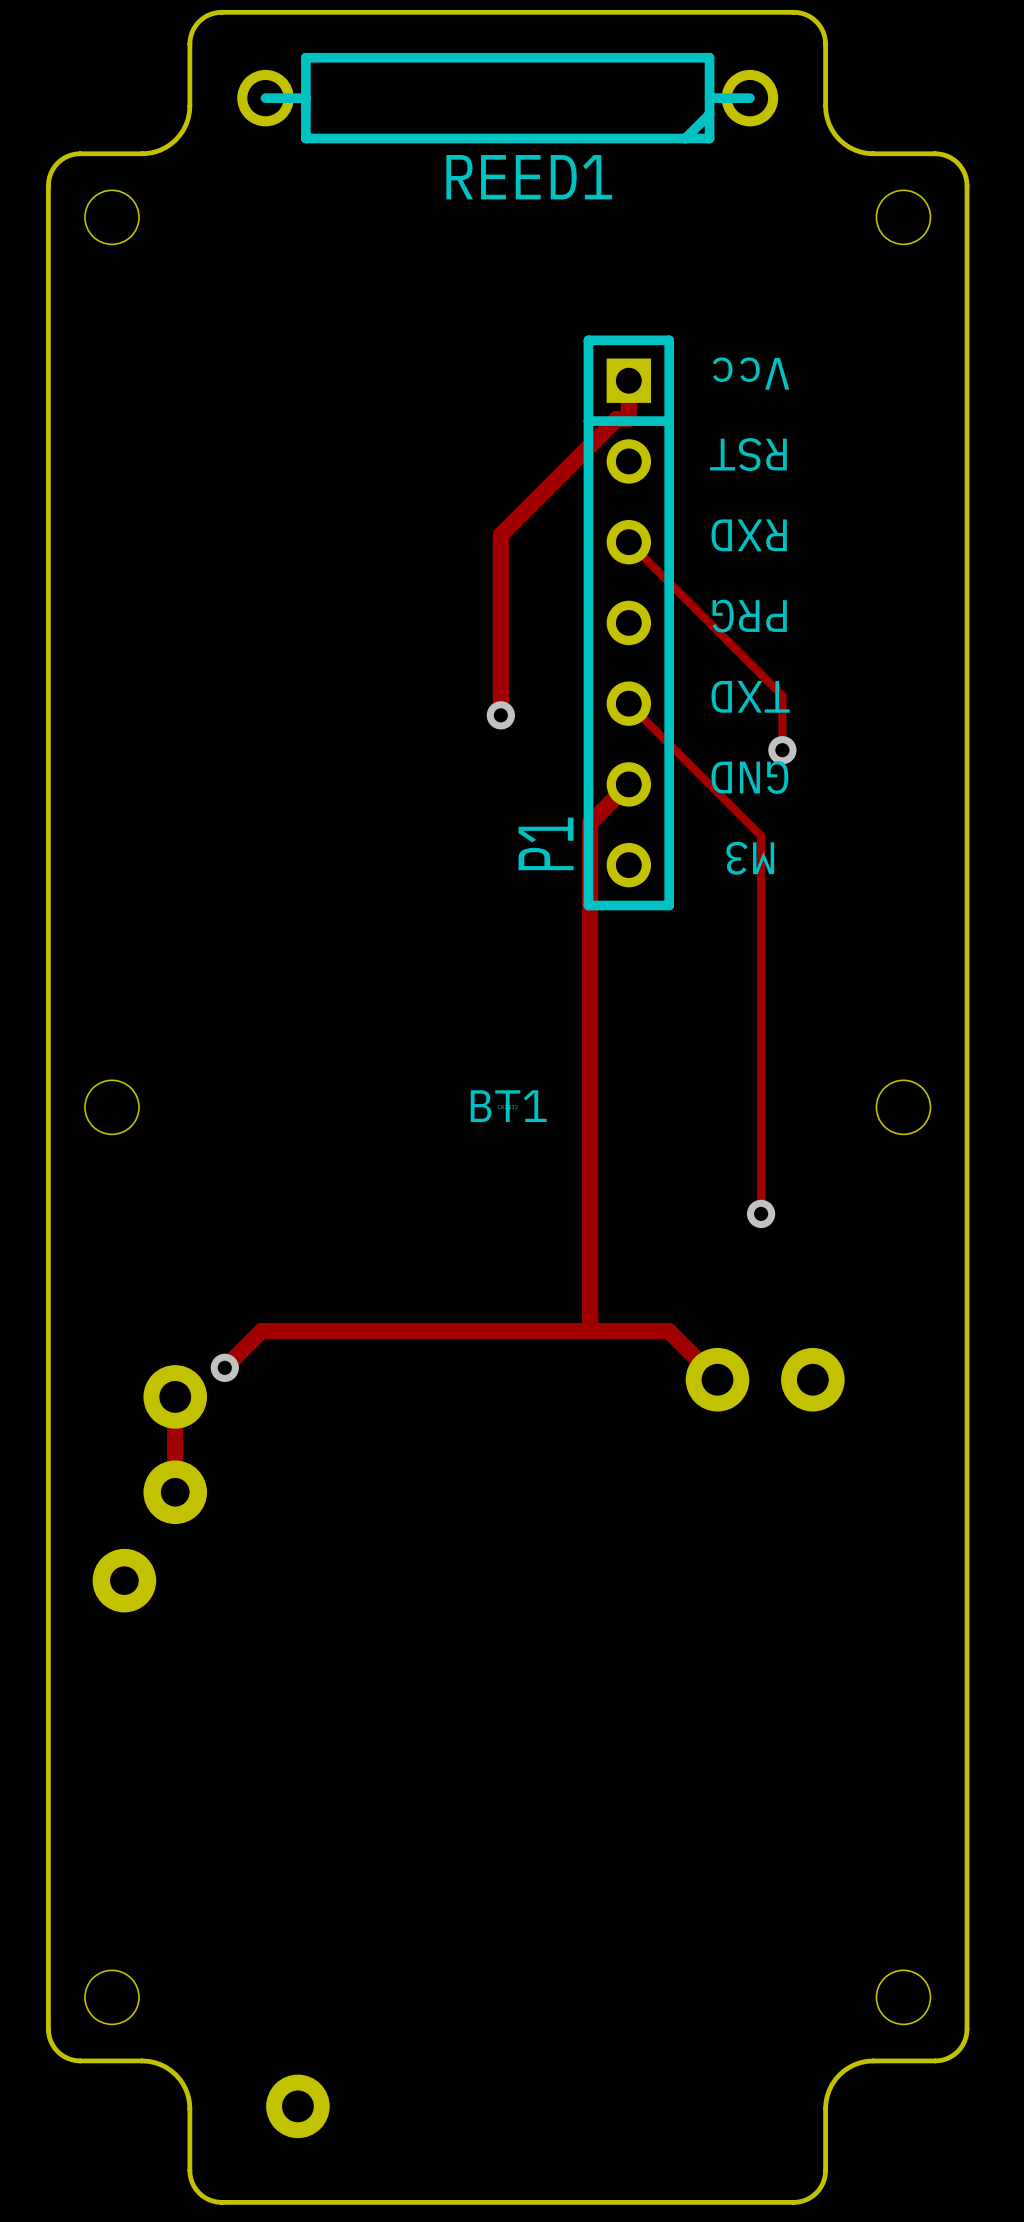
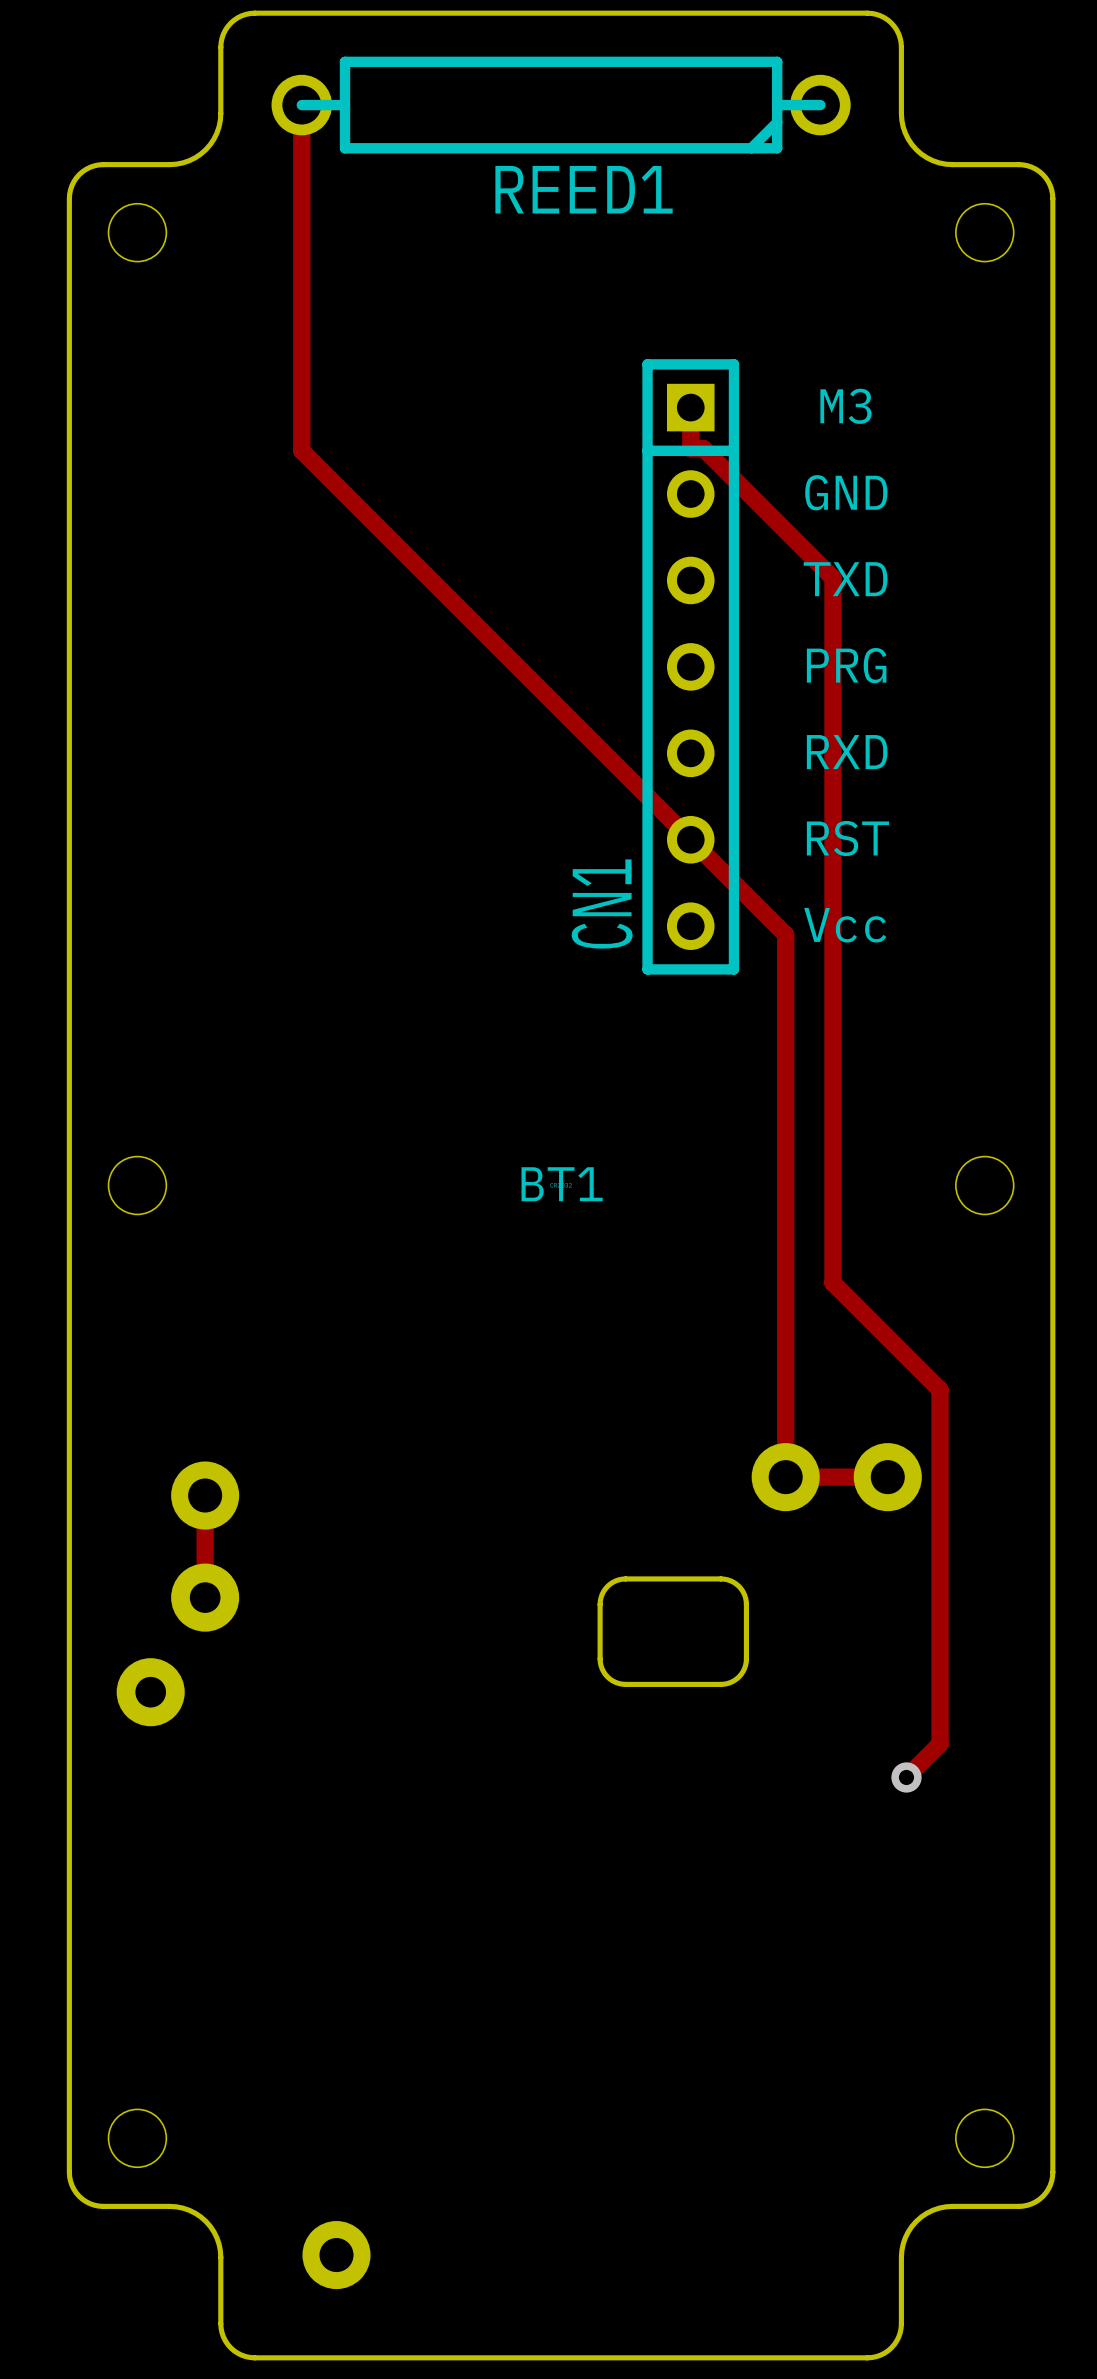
track: none -> (301, 105) (301, 450) (785, 934) (785, 1477) (887, 1477)
text rotation: 0° (751, 373) -> 180° (845, 925)
text position: Vcc (751, 373) -> Vcc (845, 925)
track: (628, 419) (616, 419) (500, 535) (500, 715) -> (690, 448) (703, 448) (832, 578) (832, 1282) (940, 1389) (940, 1743) (906, 1777)
text rotation: 0° (748, 454) -> 180° (847, 838)
text position: RST (748, 454) -> RST (847, 838)
text rotation: 0° (749, 535) -> 180° (847, 752)
text position: RXD (749, 535) -> RXD (847, 752)
track: (628, 542) (782, 695) (782, 750) -> none
text rotation: 0° (749, 616) -> 180° (846, 665)
text rotation: 0° (750, 696) -> 180° (845, 579)
text position: TXD (750, 696) -> TXD (845, 579)
track: (628, 703) (761, 835) (761, 1213) -> none
via: (500, 715) -> none
via: (782, 750) -> none
text rotation: 0° (749, 777) -> 180° (846, 492)
text position: GND (749, 777) -> GND (846, 492)
track: (628, 784) (590, 823) (590, 1331) -> none
P1 name: P1 (546, 843) -> CN1 (602, 903)
text rotation: 0° (750, 858) -> 180° (846, 406)
text position: M3 (750, 858) -> M3 (846, 406)
via: (761, 1213) -> none
track: (224, 1367) (261, 1331) (668, 1331) (717, 1379) -> none
via: (224, 1367) -> none
part: none -> (673, 1631)
via: none -> (906, 1777)

